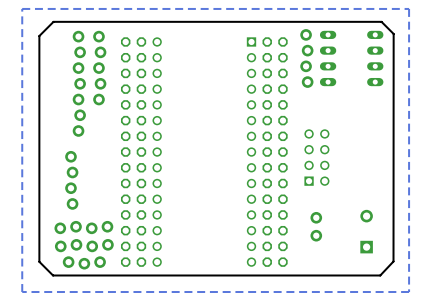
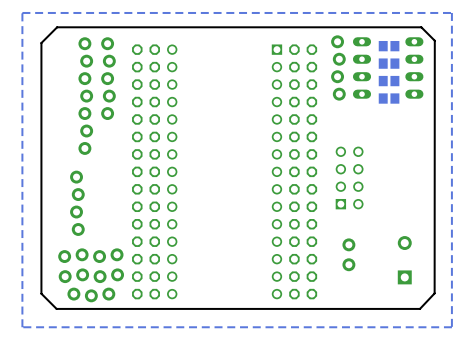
part: none -> (389, 46)
part: none -> (389, 63)
part: none -> (389, 81)
part: none -> (389, 98)

